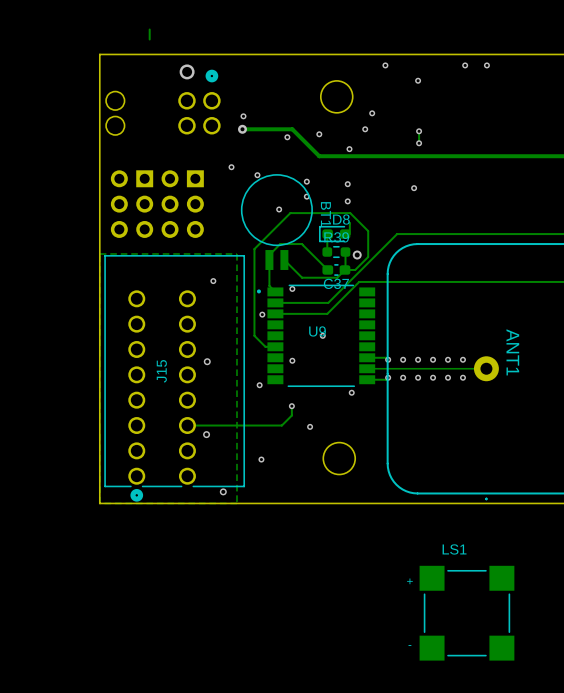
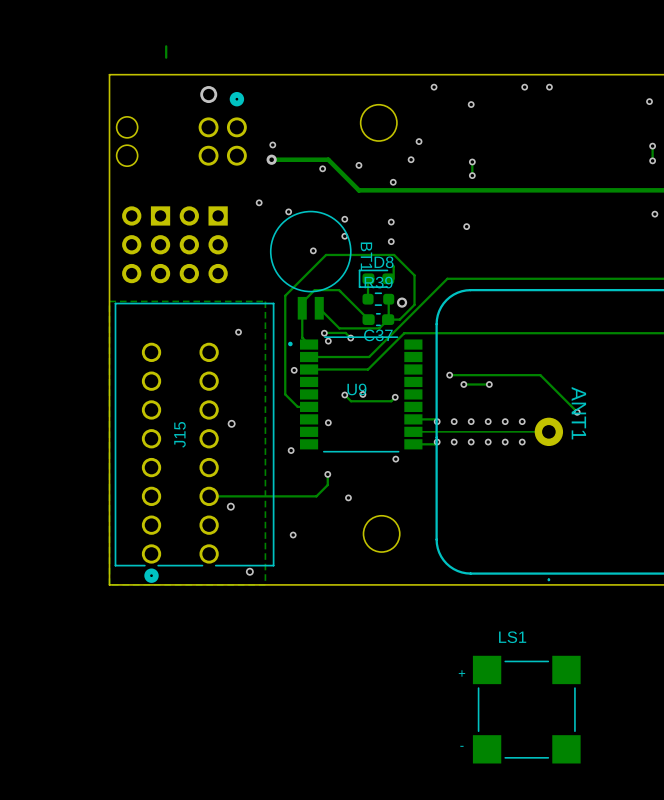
track: none -> (324, 333) (345, 332) (350, 338)
via: none -> (324, 333)
via: none -> (350, 338)
track: none -> (449, 375) (540, 375) (577, 412)
via: none -> (449, 375)
via: none -> (463, 384)
track: none -> (489, 384) (463, 384)
via: none -> (489, 384)
track: none -> (344, 395) (351, 401) (391, 401) (395, 397)
via: none -> (344, 395)
via: none -> (395, 397)
via: none -> (577, 412)

